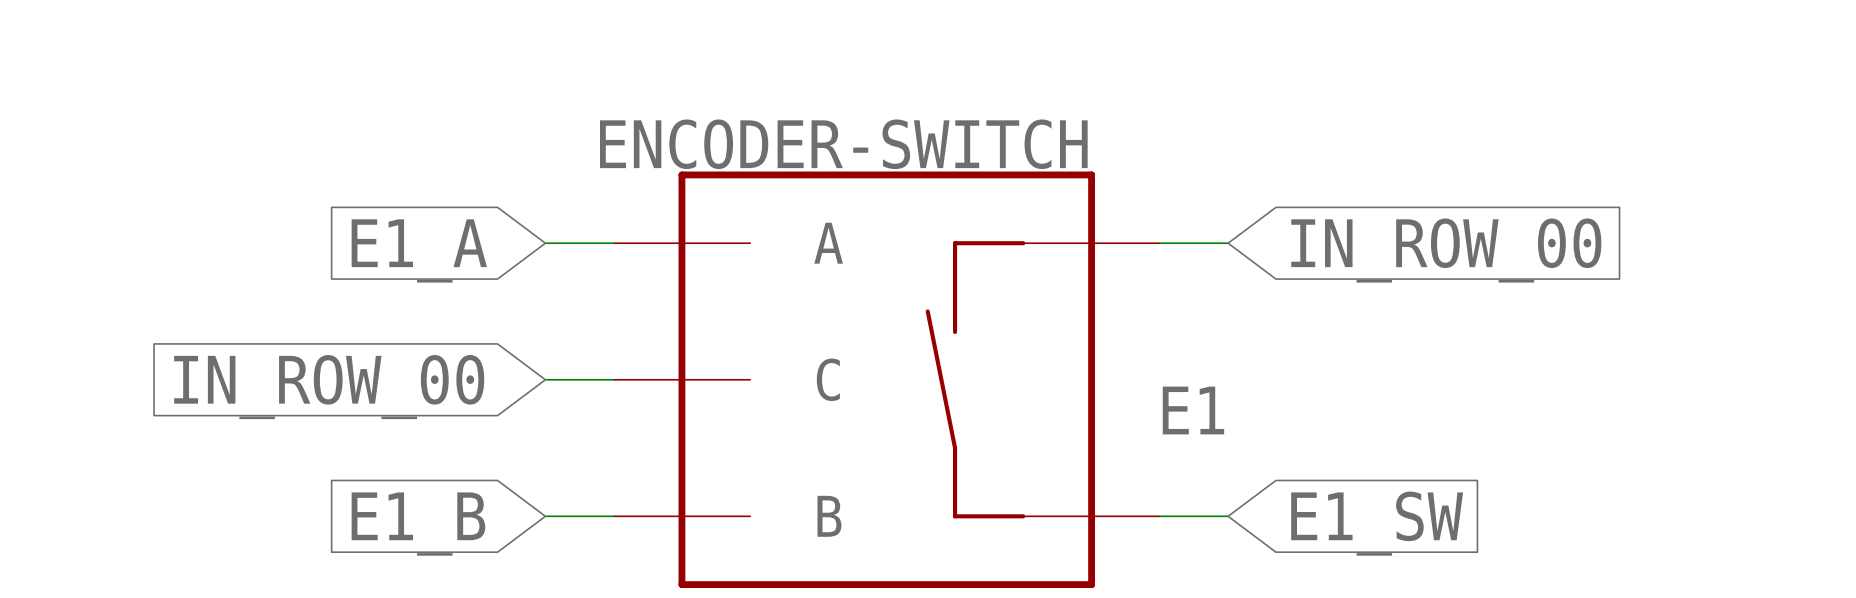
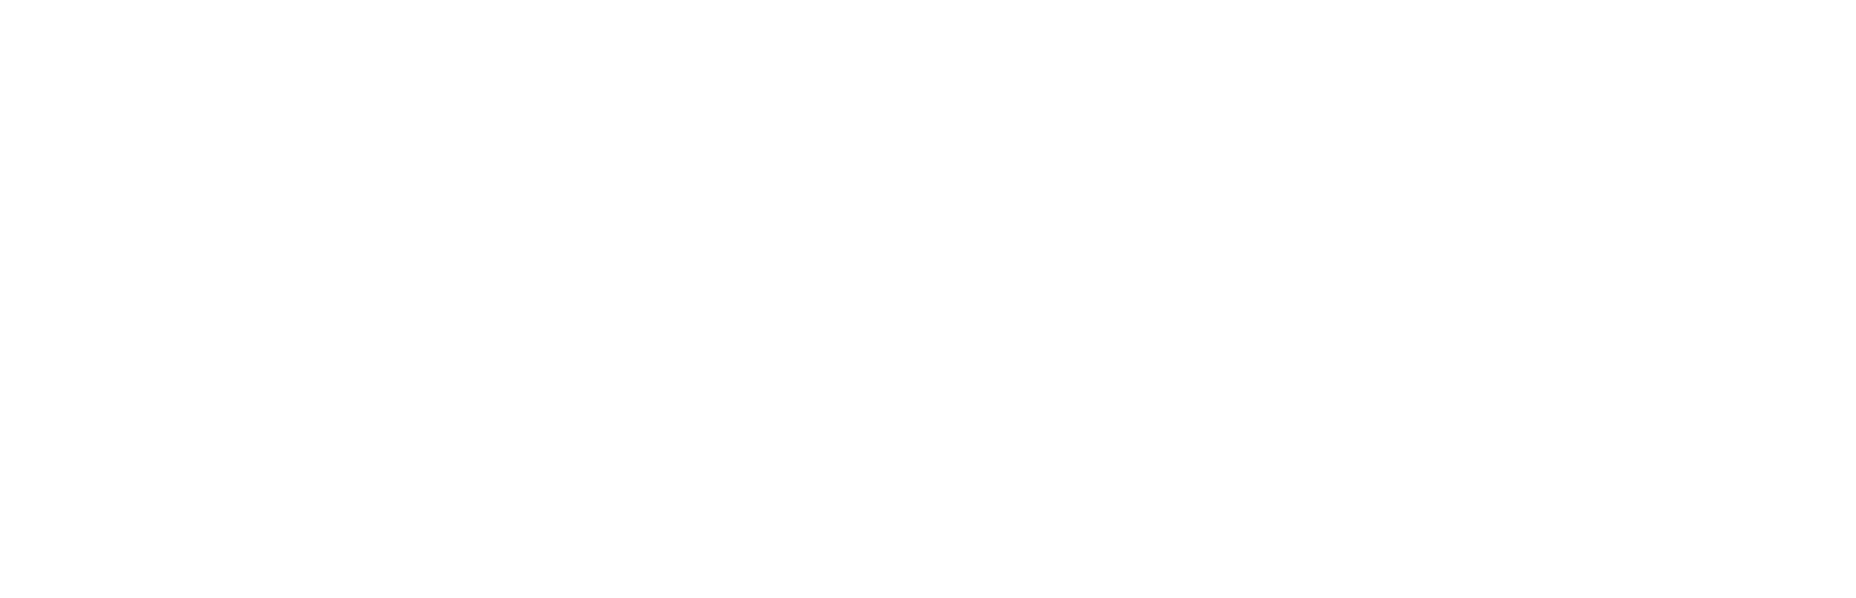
wire: (545, 243) (613, 243) -> none
wire: (1159, 243) (1228, 243) -> none
global label: E1_A (419, 250) -> none
global label: IN_ROW_00 (1446, 250) -> none
wire: (545, 379) (613, 379) -> none
E1: ENCODER-SWITCH (886, 379) -> none
global label: IN_ROW_00 (329, 387) -> none
wire: (545, 516) (613, 516) -> none
wire: (1159, 516) (1228, 516) -> none
global label: E1_SW (1377, 523) -> none
global label: E1_B (418, 524) -> none

